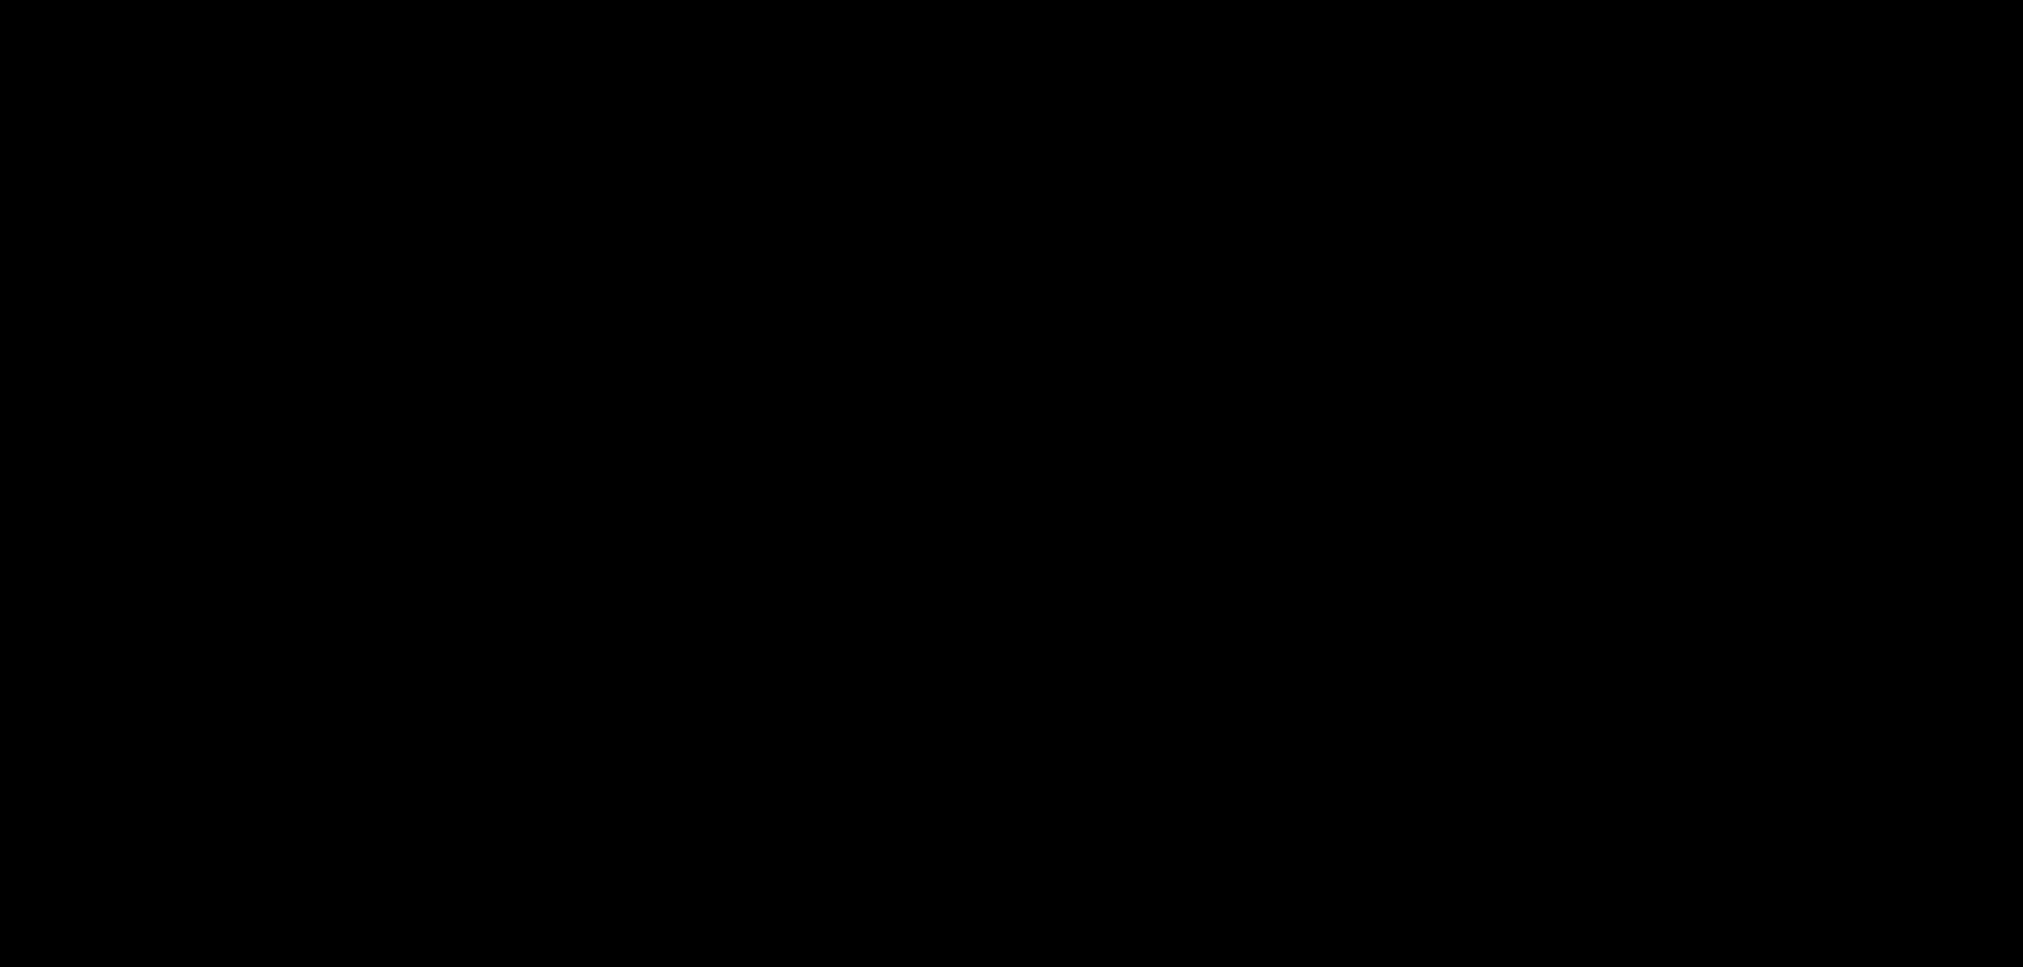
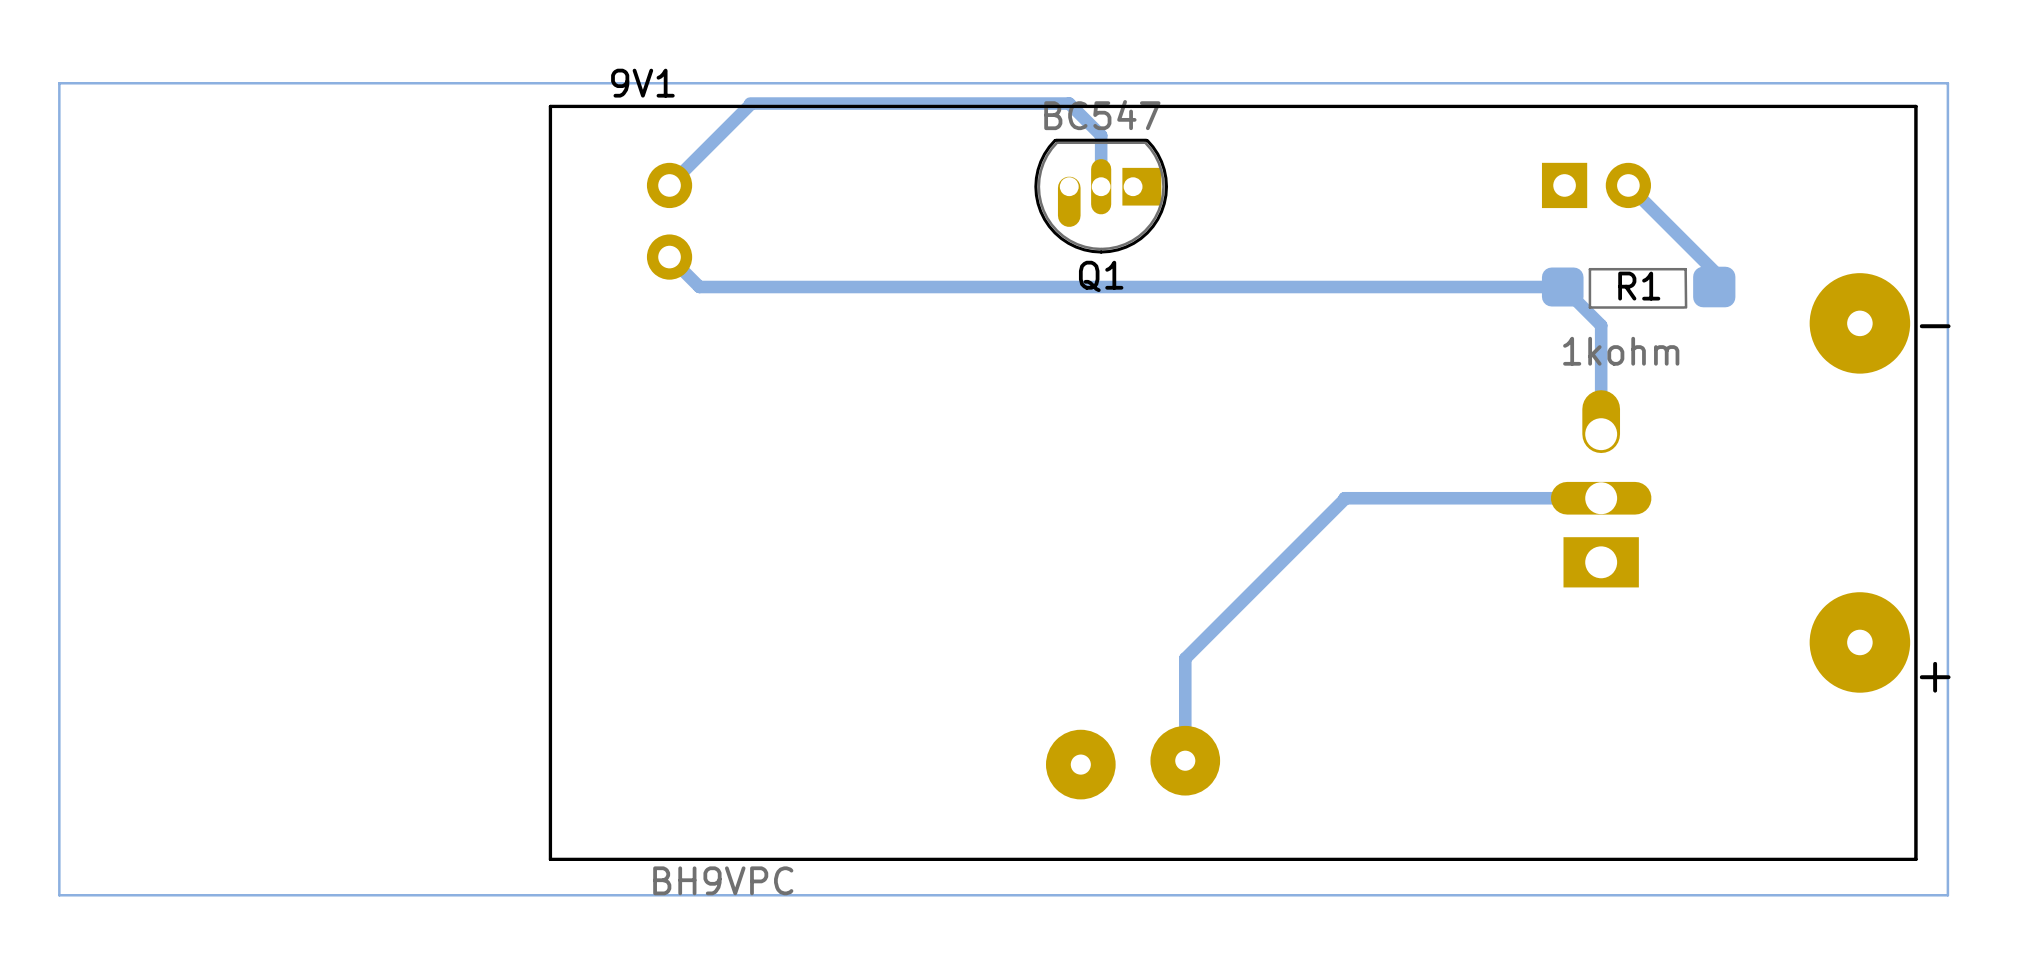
track: none -> (1947, 83) (59, 83) (59, 895) (1947, 895) (1947, 83)
track: none -> (669, 185) (750, 103) (1069, 103) (1101, 135) (1101, 186)
part: none -> (669, 185)
part: none -> (1596, 185)
track: none -> (1628, 185) (1714, 271) (1714, 287)
Q1: none -> BC547 (1101, 196)
track: none -> (669, 257) (699, 287) (1562, 287) (1601, 325) (1601, 434)
part: none -> (669, 257)
R1: none -> 1kohm (1638, 287)
9V1: none -> BH9VPC (1233, 482)
part: none -> (1601, 488)
track: none -> (1601, 498) (1344, 498) (1185, 658) (1185, 760)
part: none -> (1133, 781)

